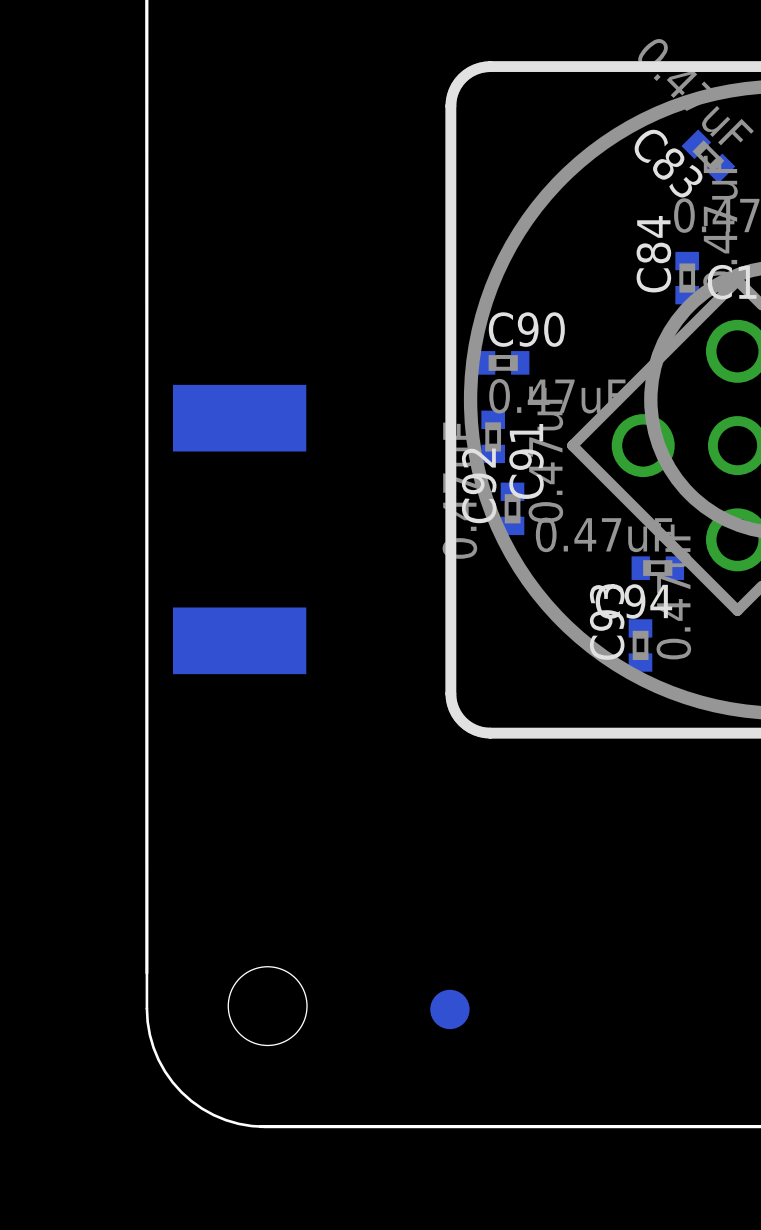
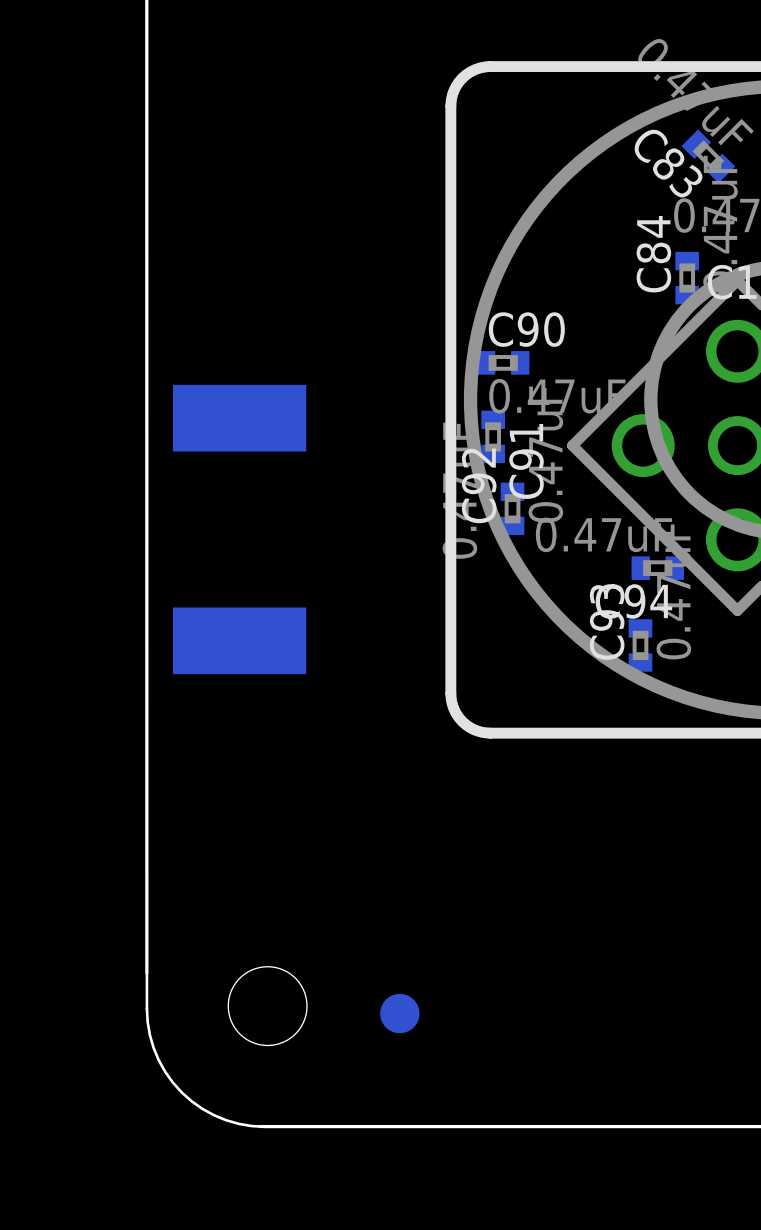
part position: (449, 1009) -> (399, 1013)

